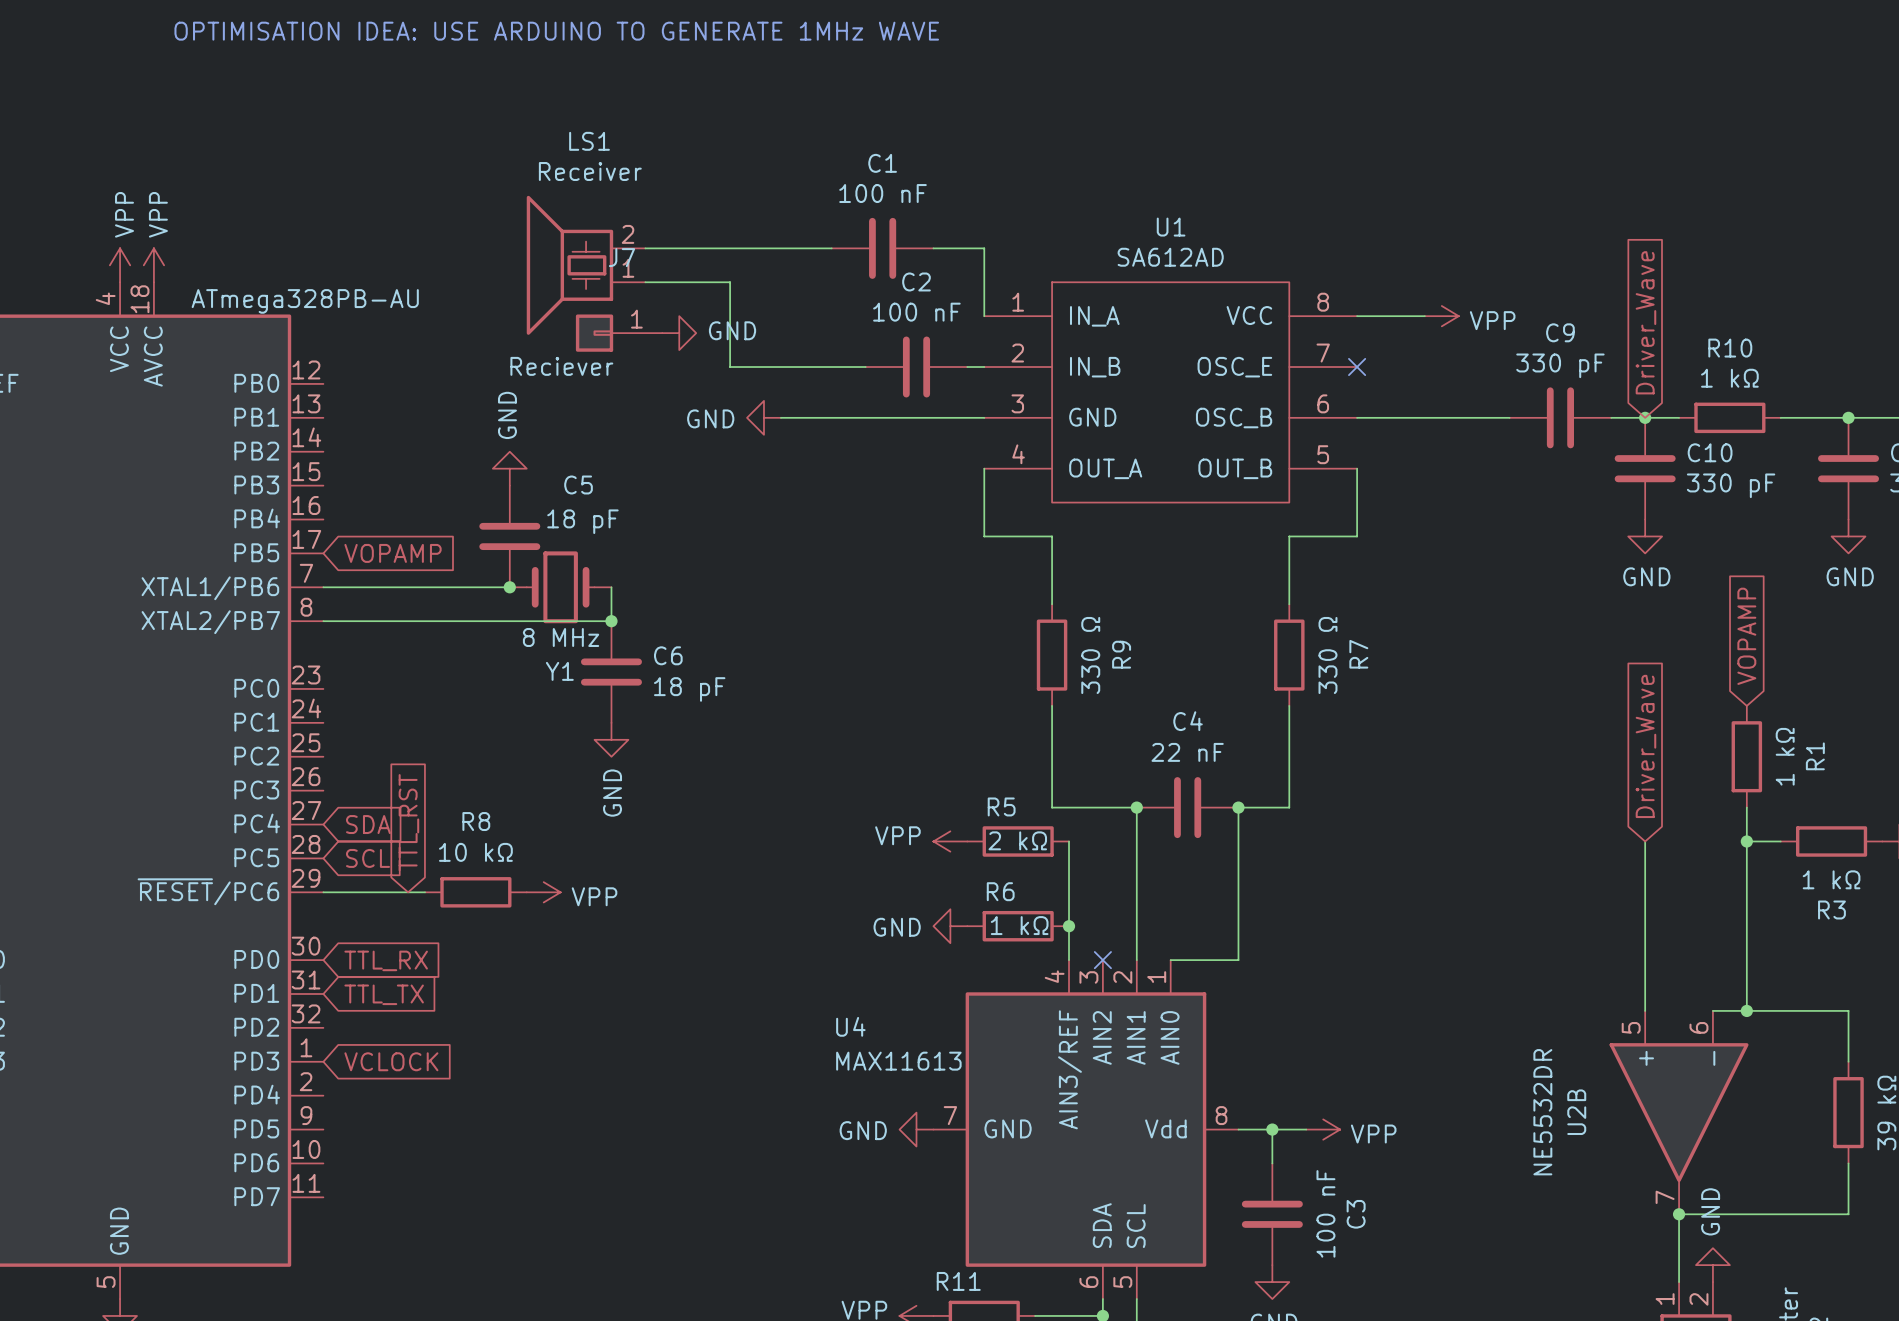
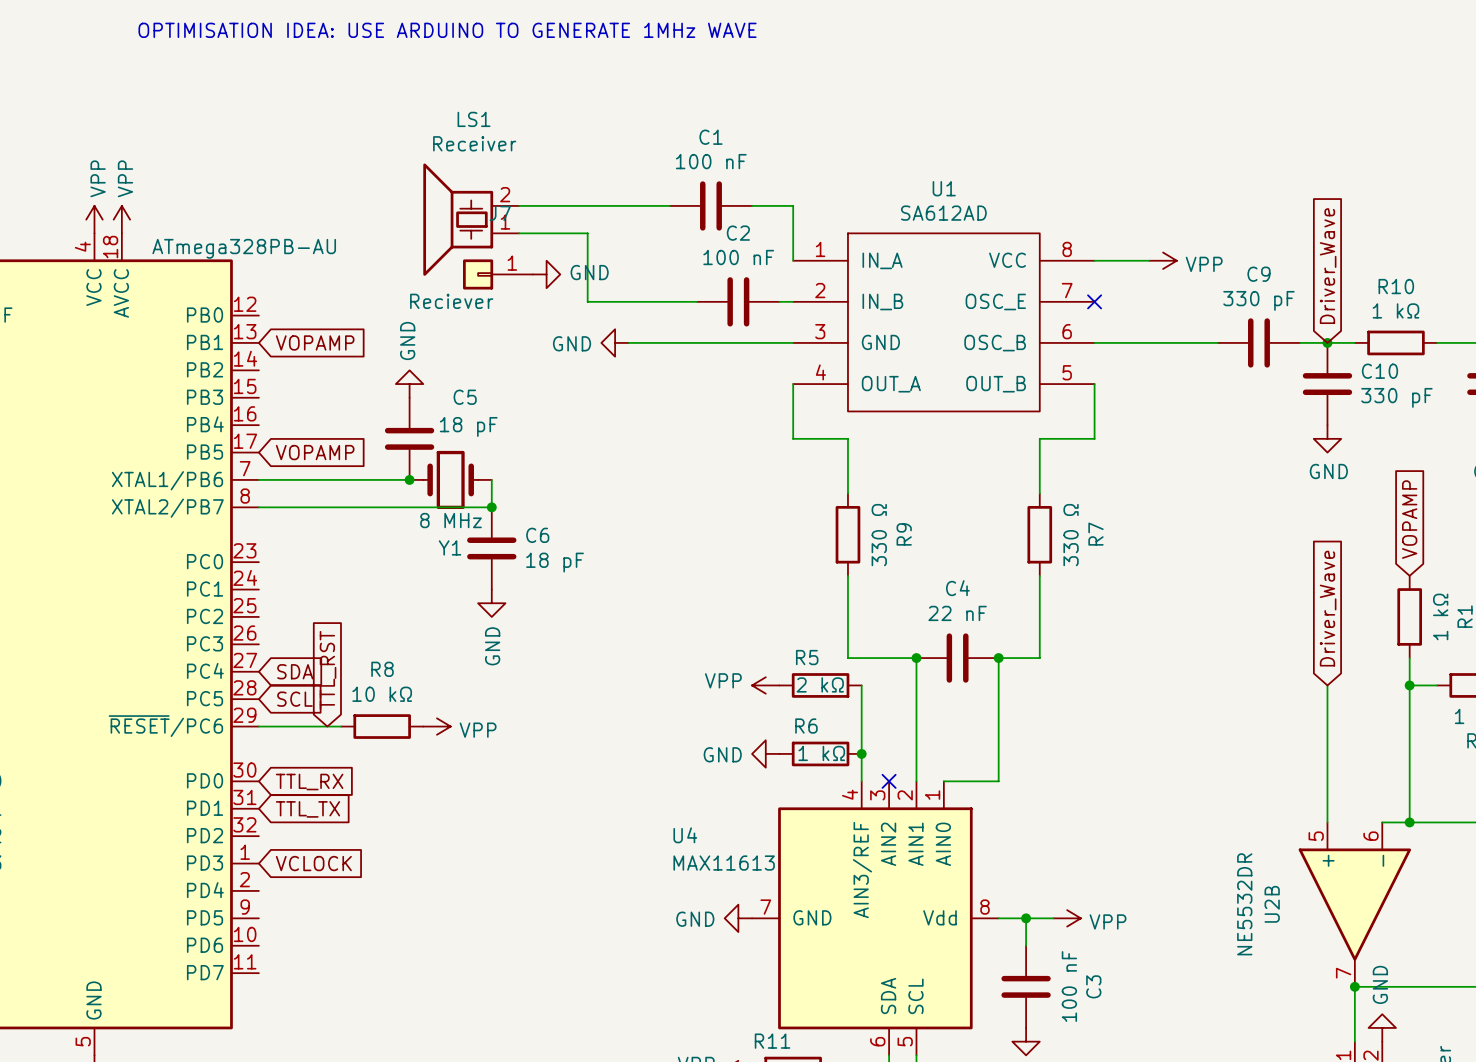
global label: none -> VOPAMP (315, 342)

